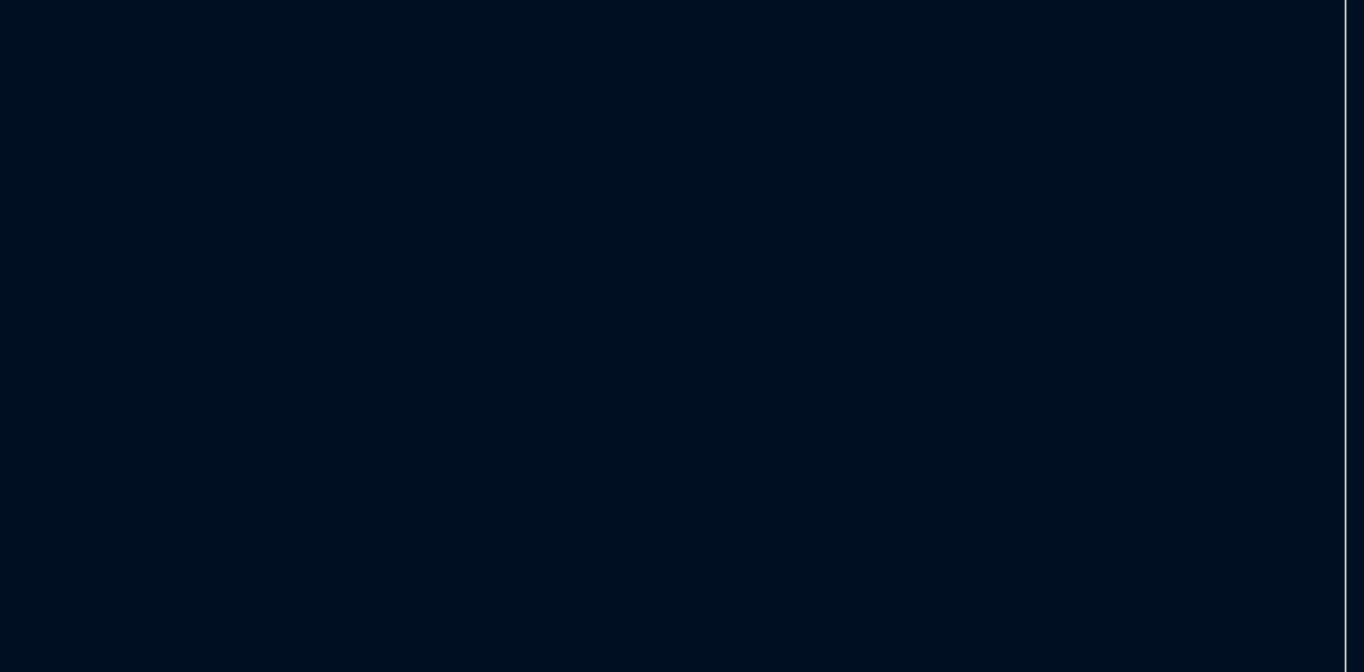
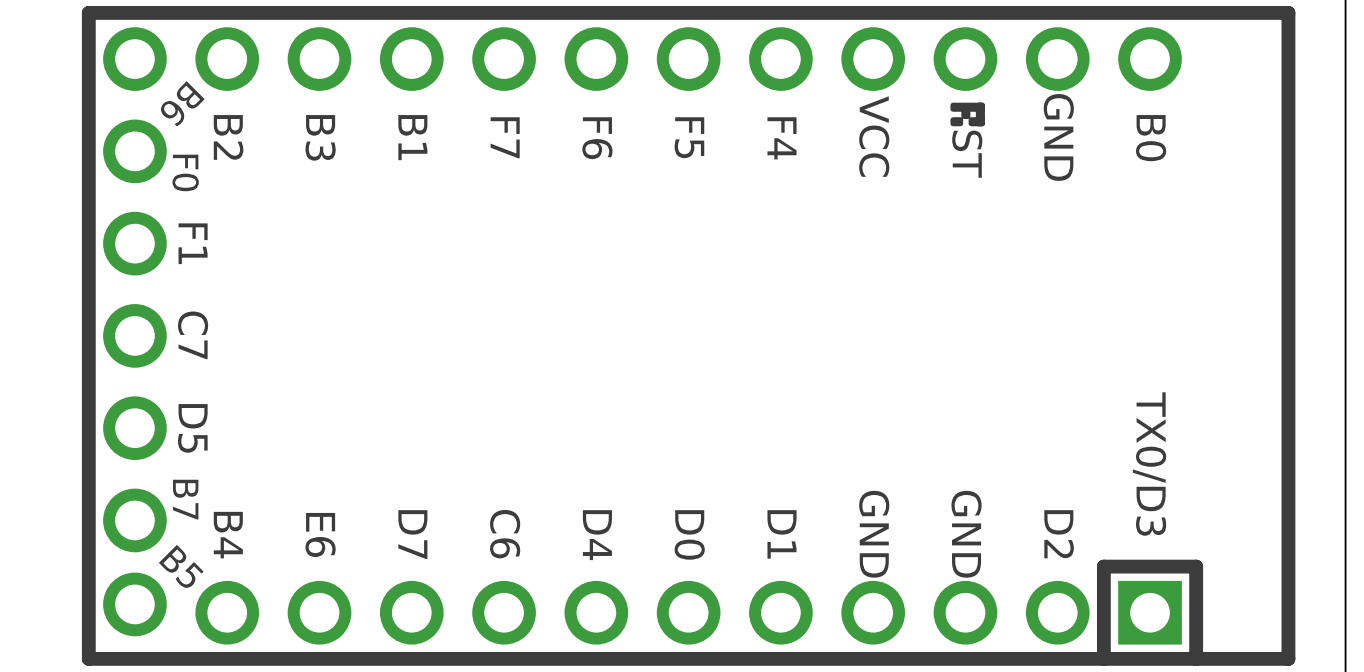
part: none -> (688, 335)

